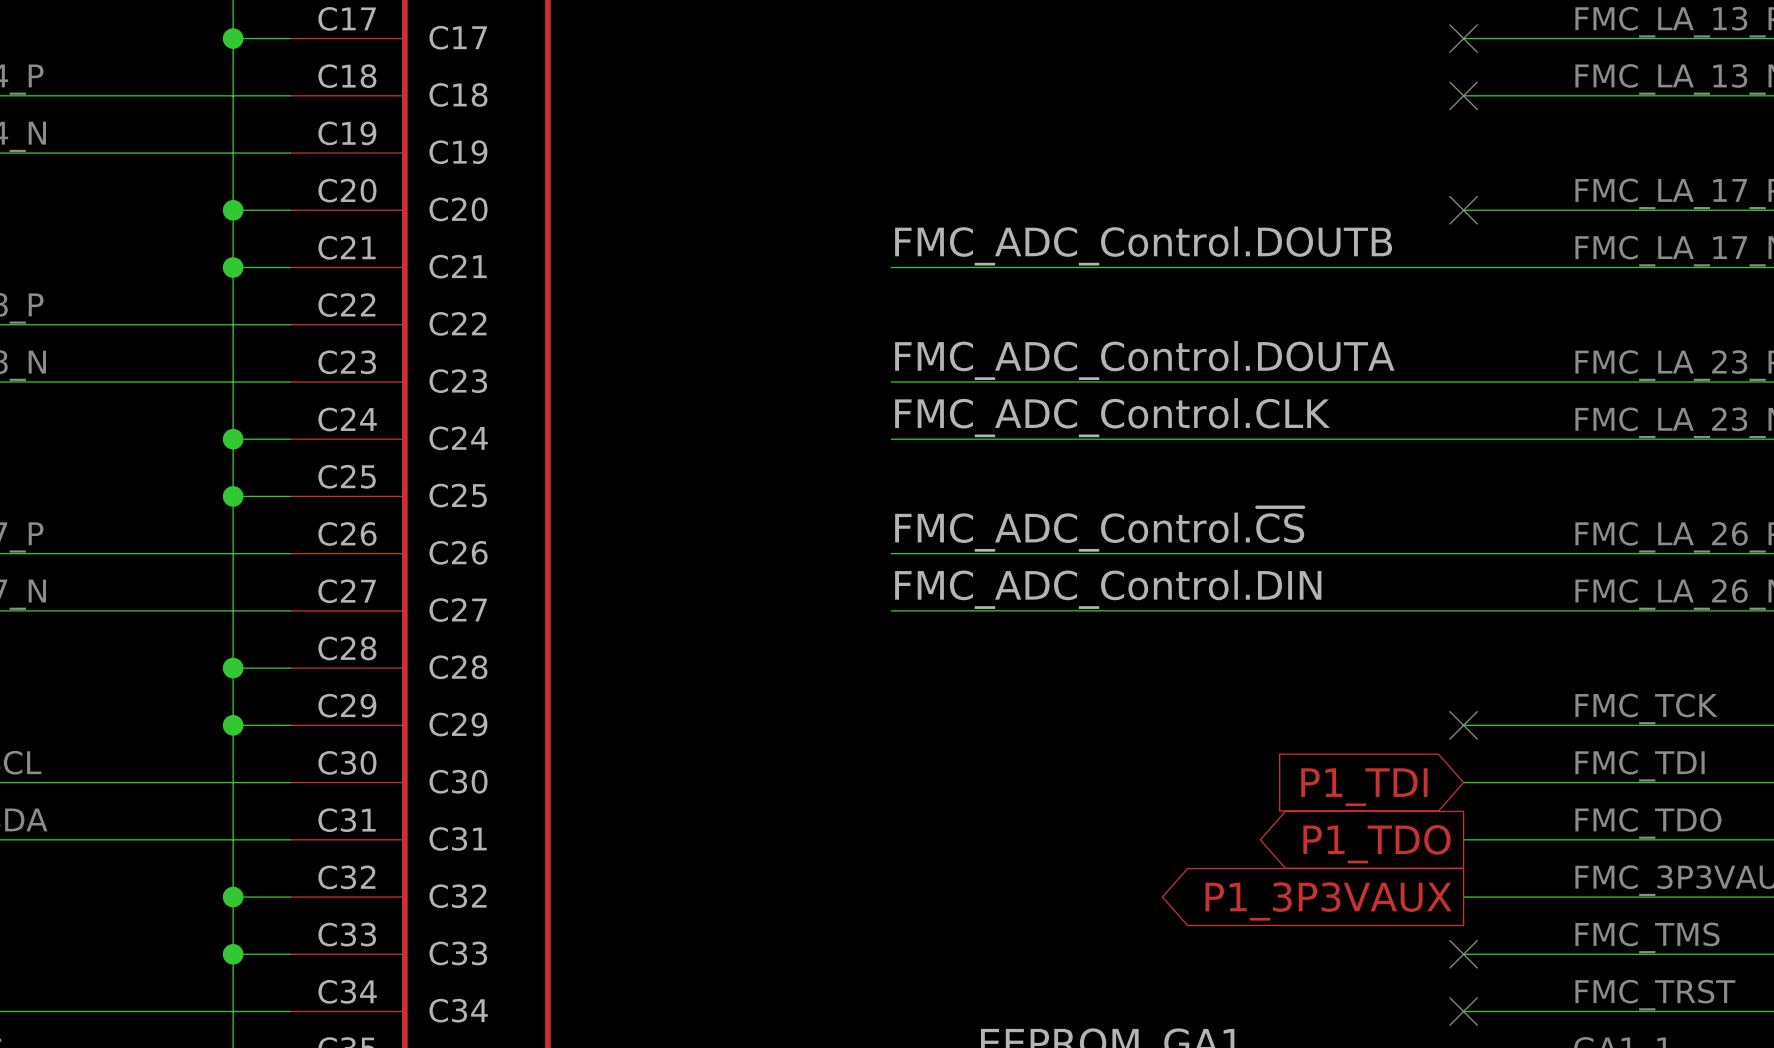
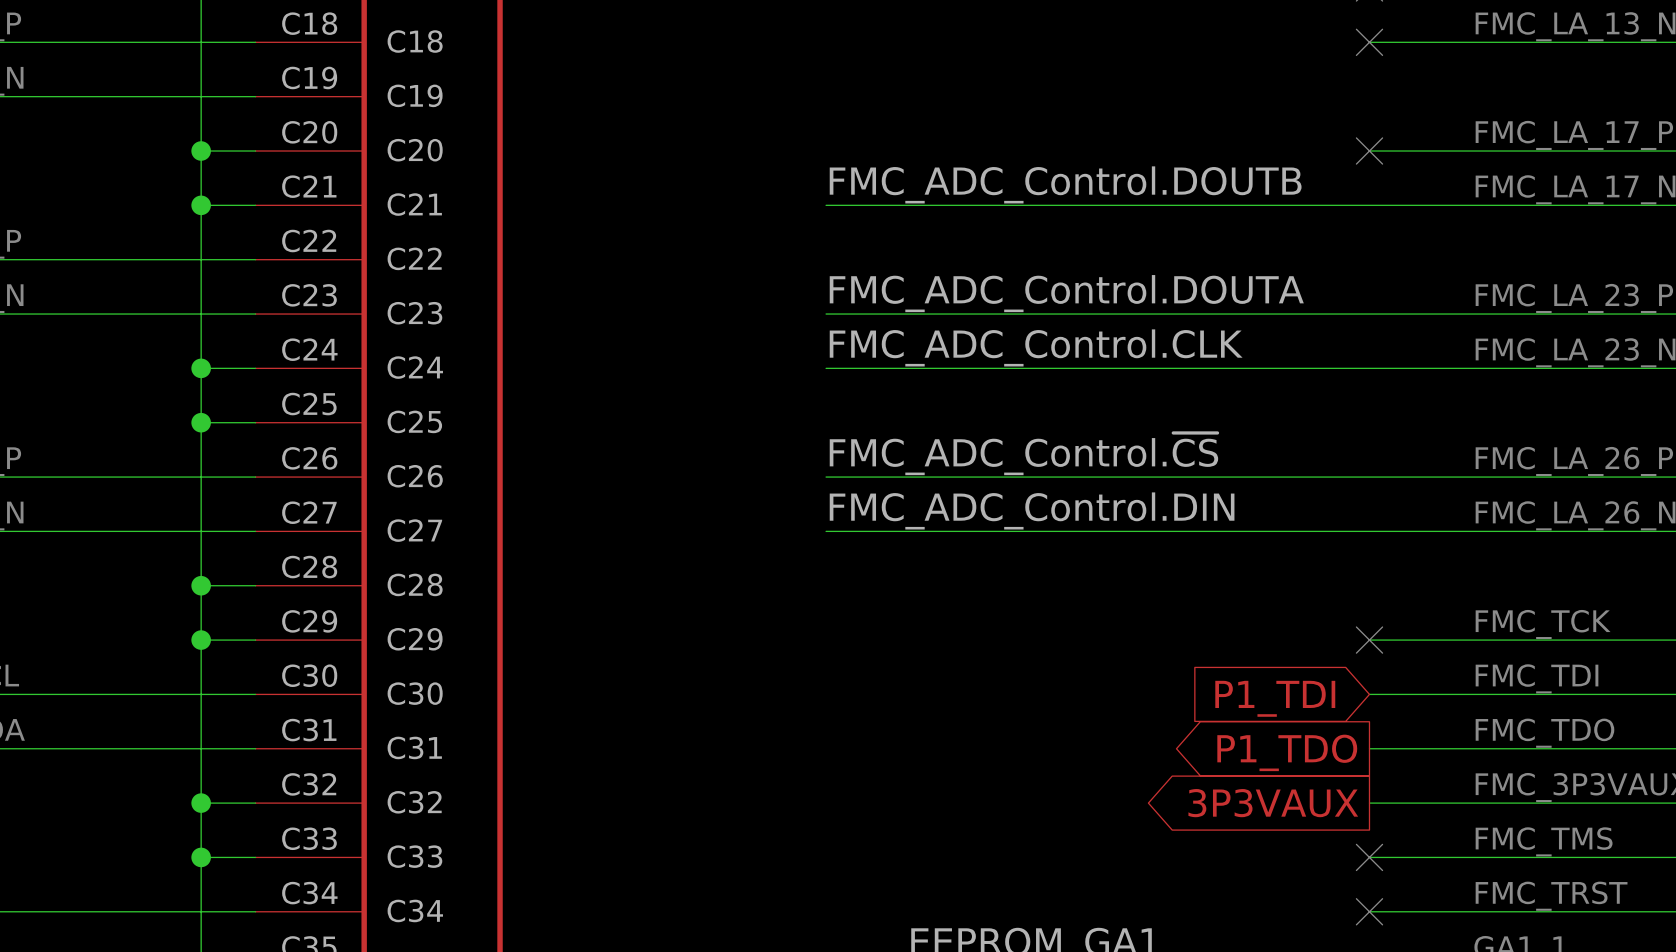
global label: P1_3P3VAUX (1328, 901) -> 3P3VAUX (1273, 803)

